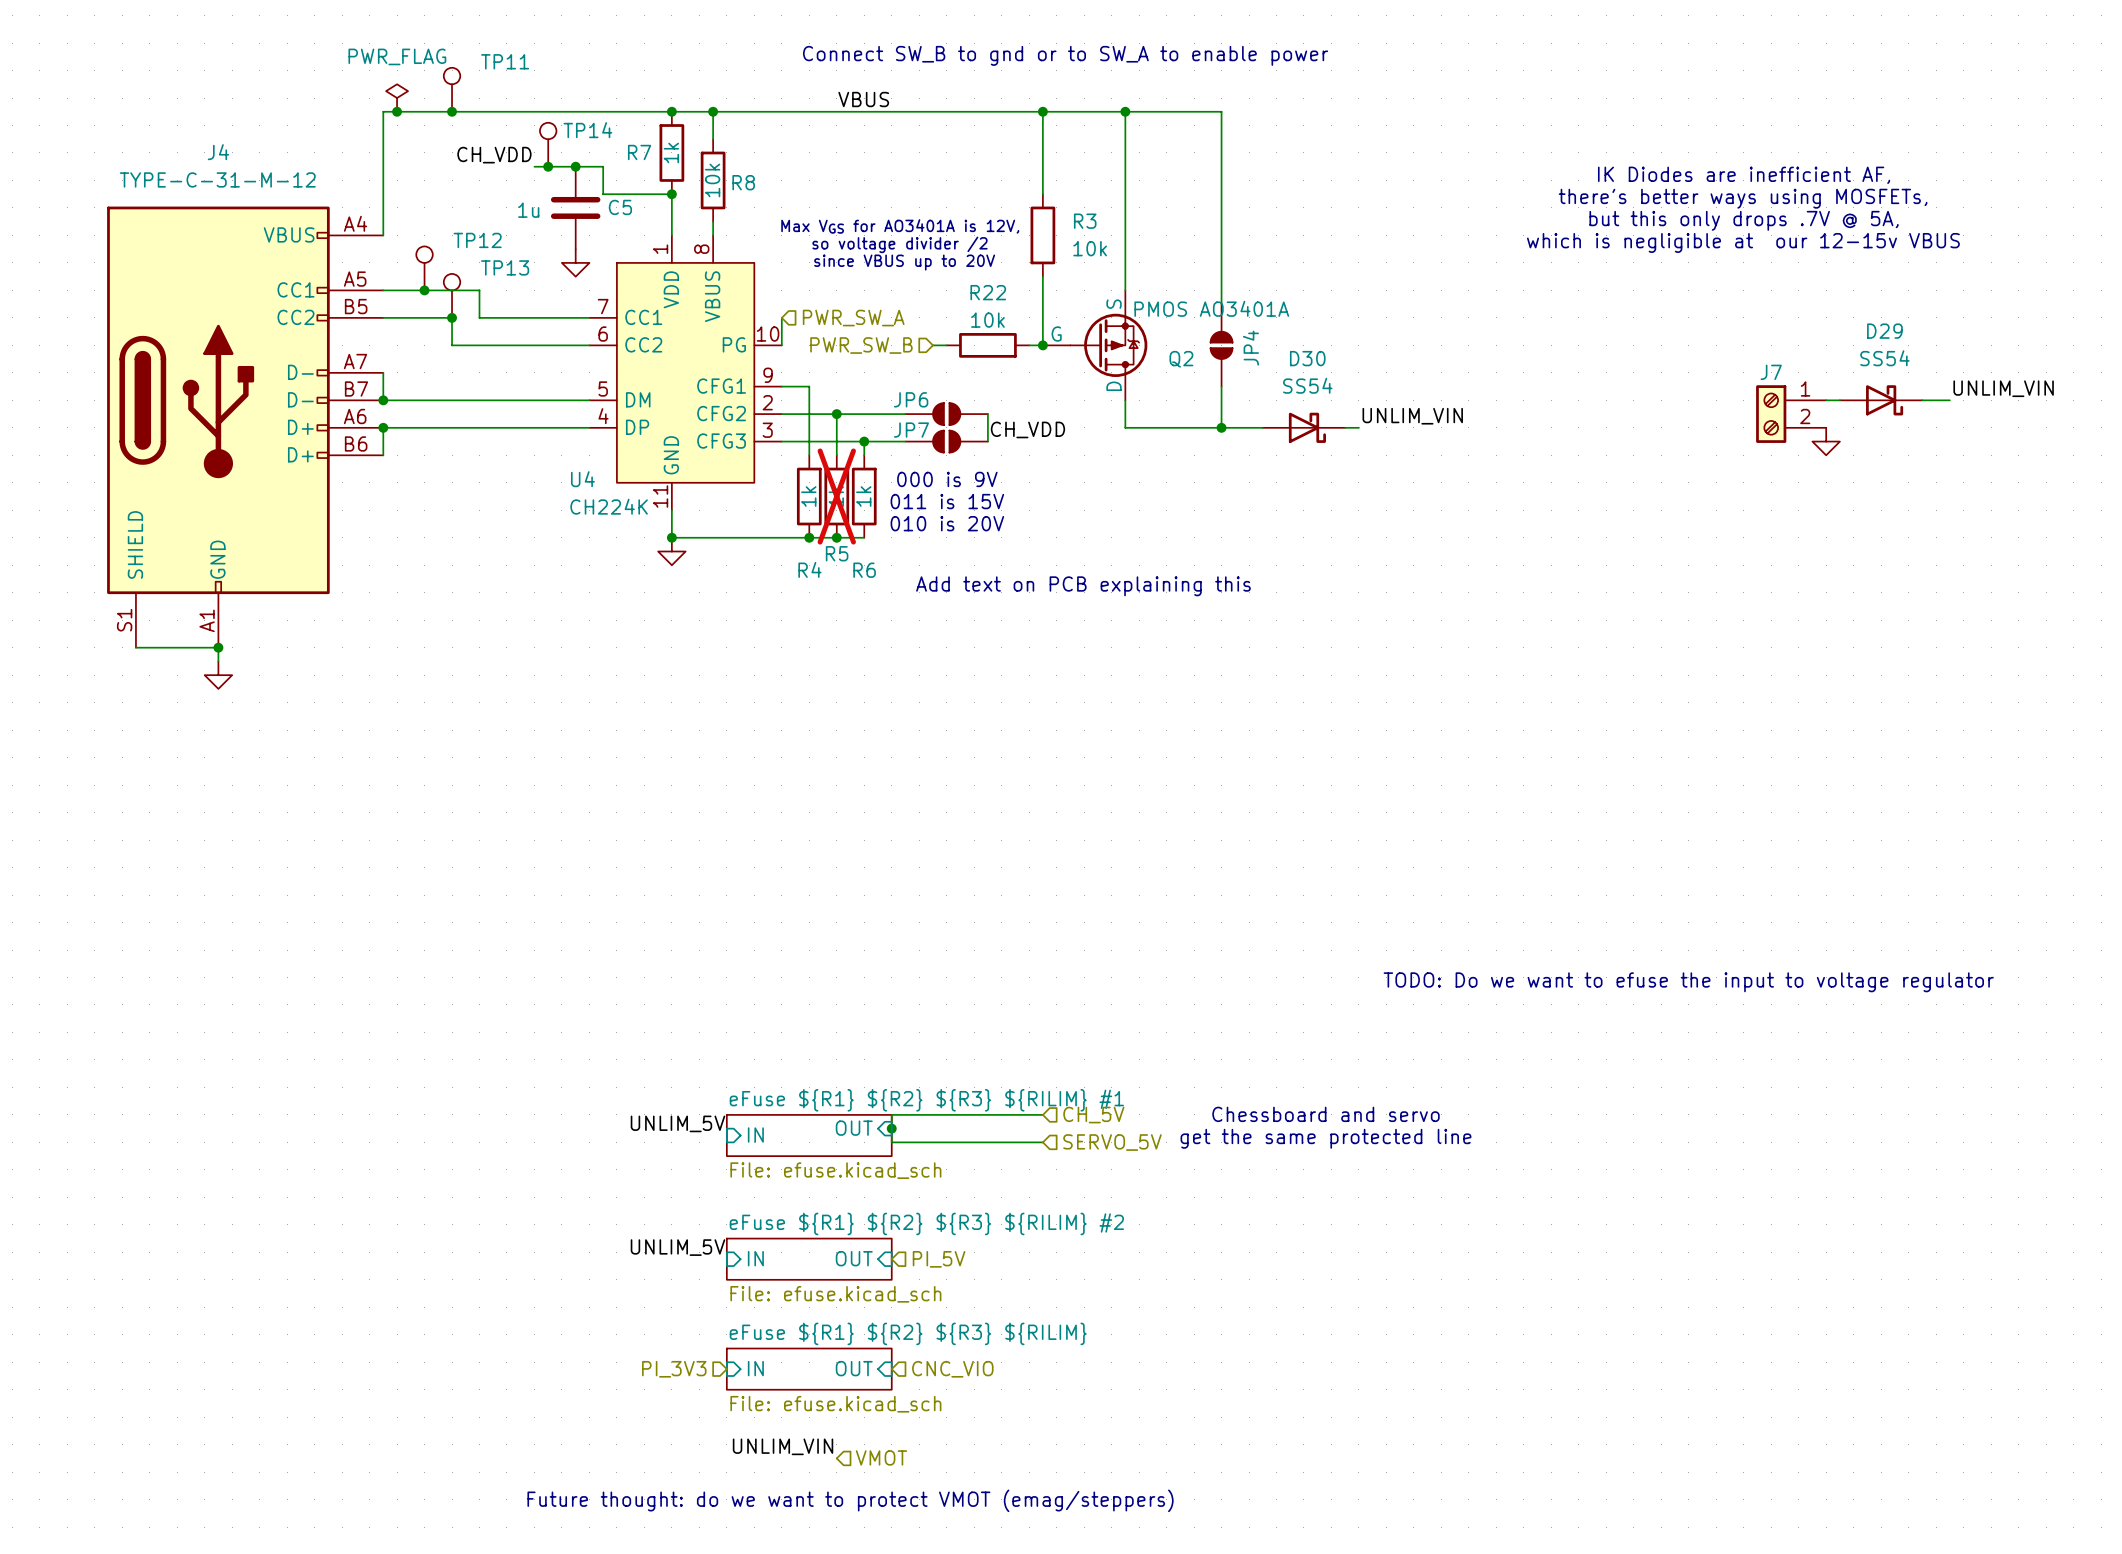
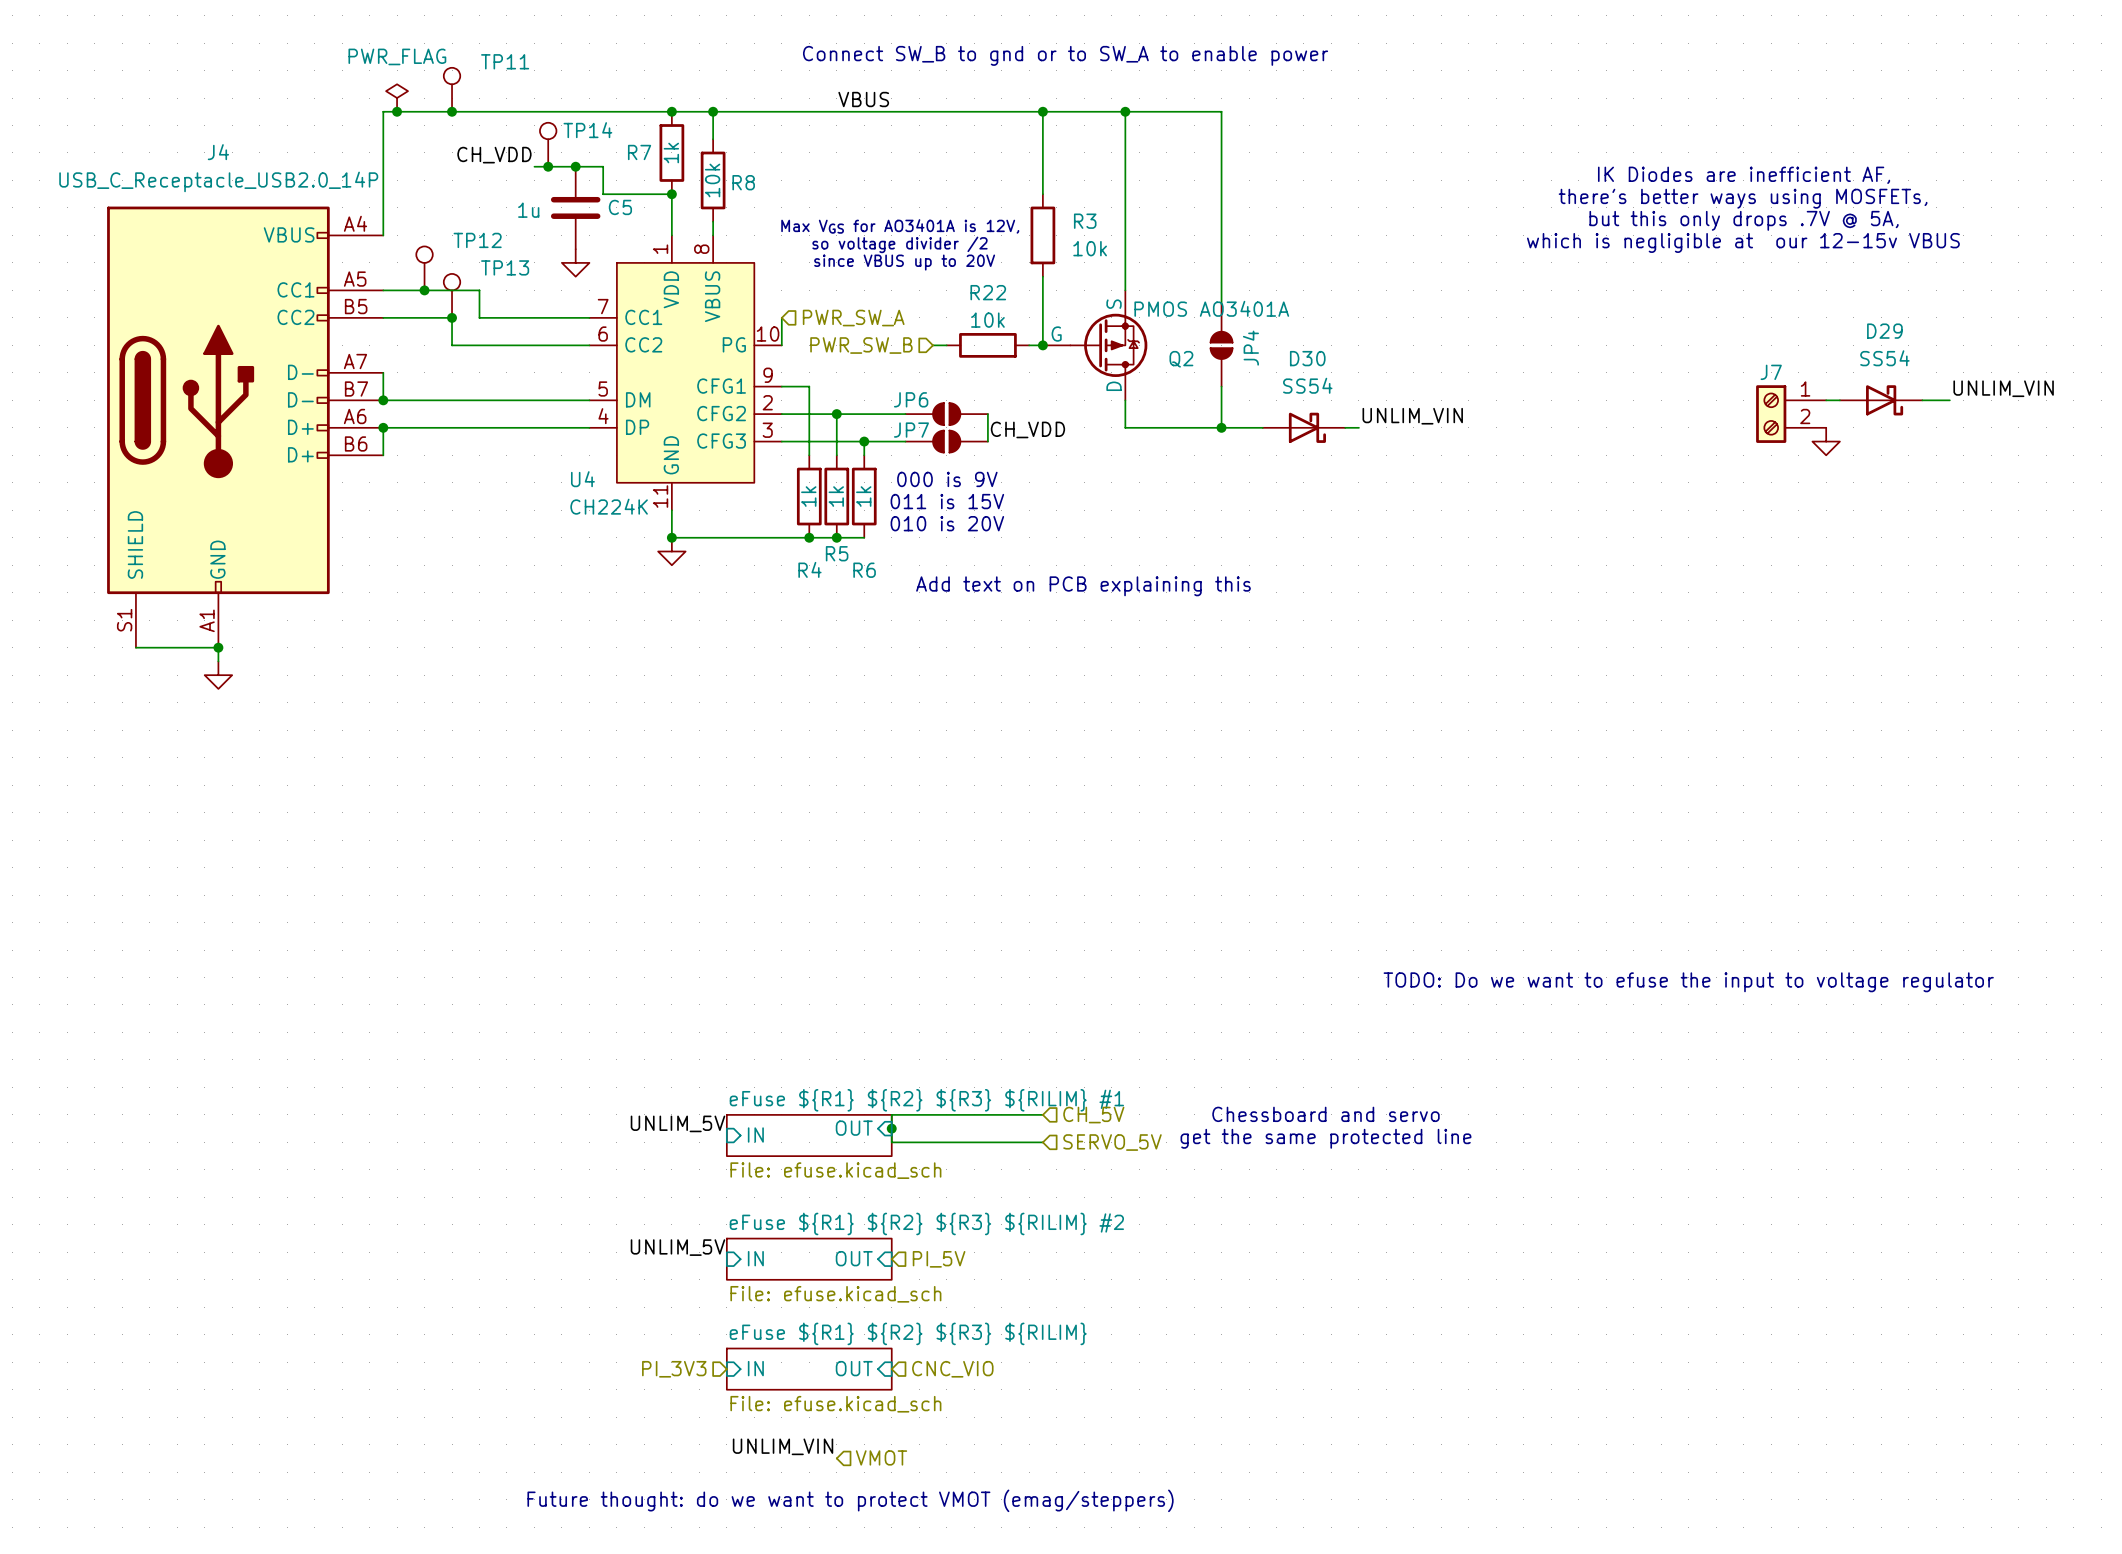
J4 value: TYPE-C-31-M-12 (217, 179) -> USB_C_Receptacle_USB2.0_14P (218, 181)
R5 do-not-place cross: (836, 496) -> none

